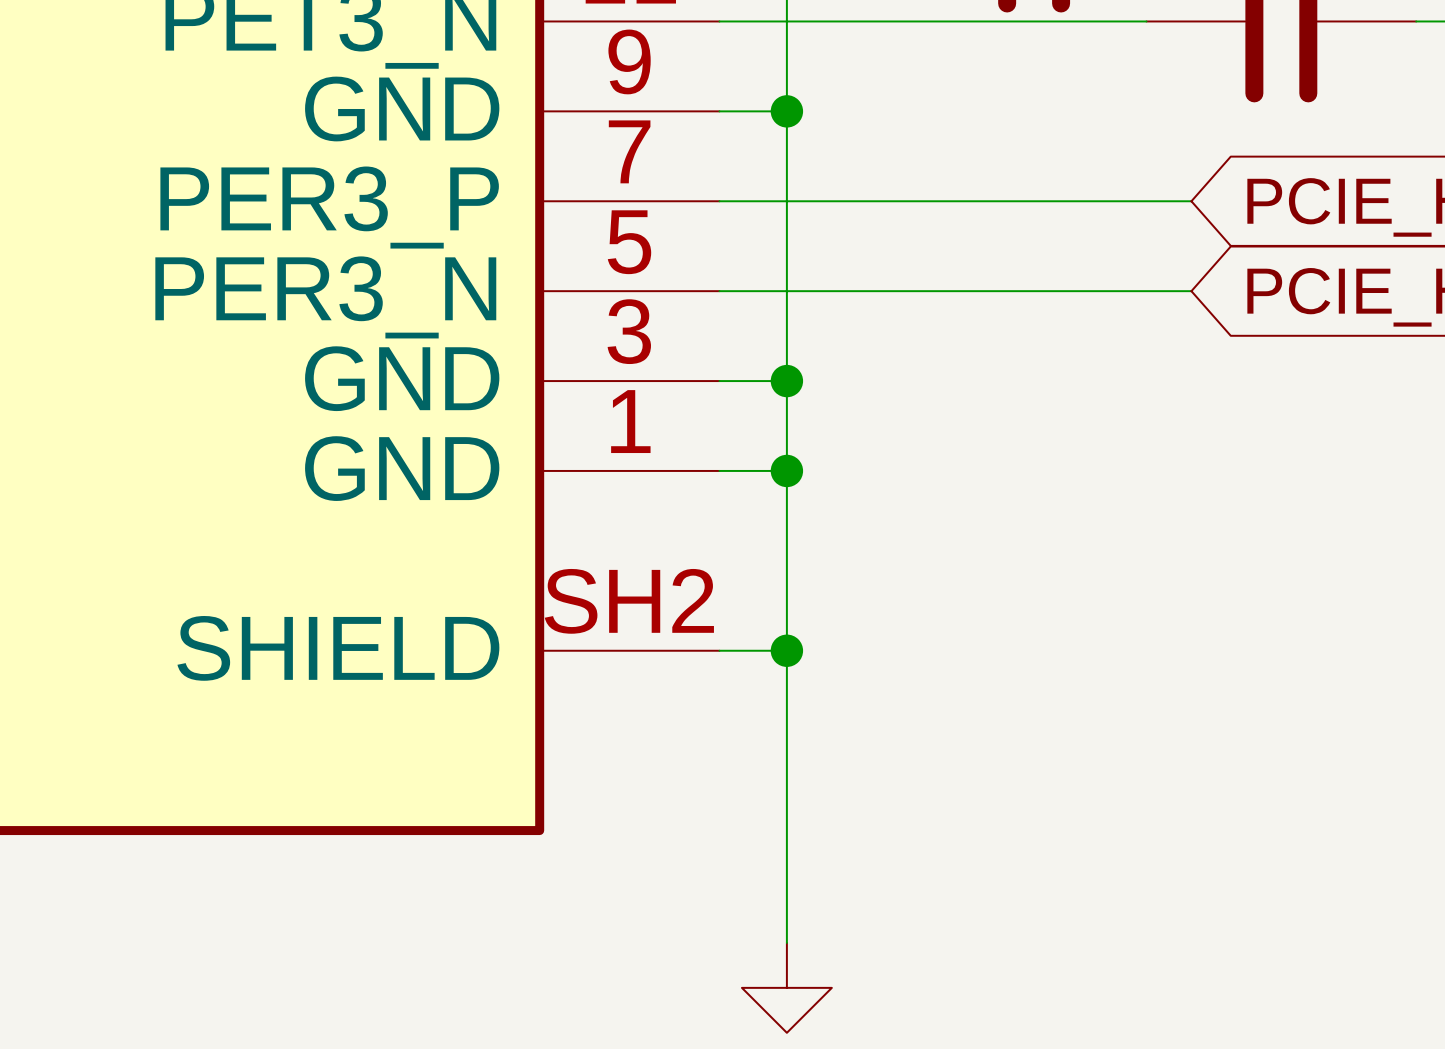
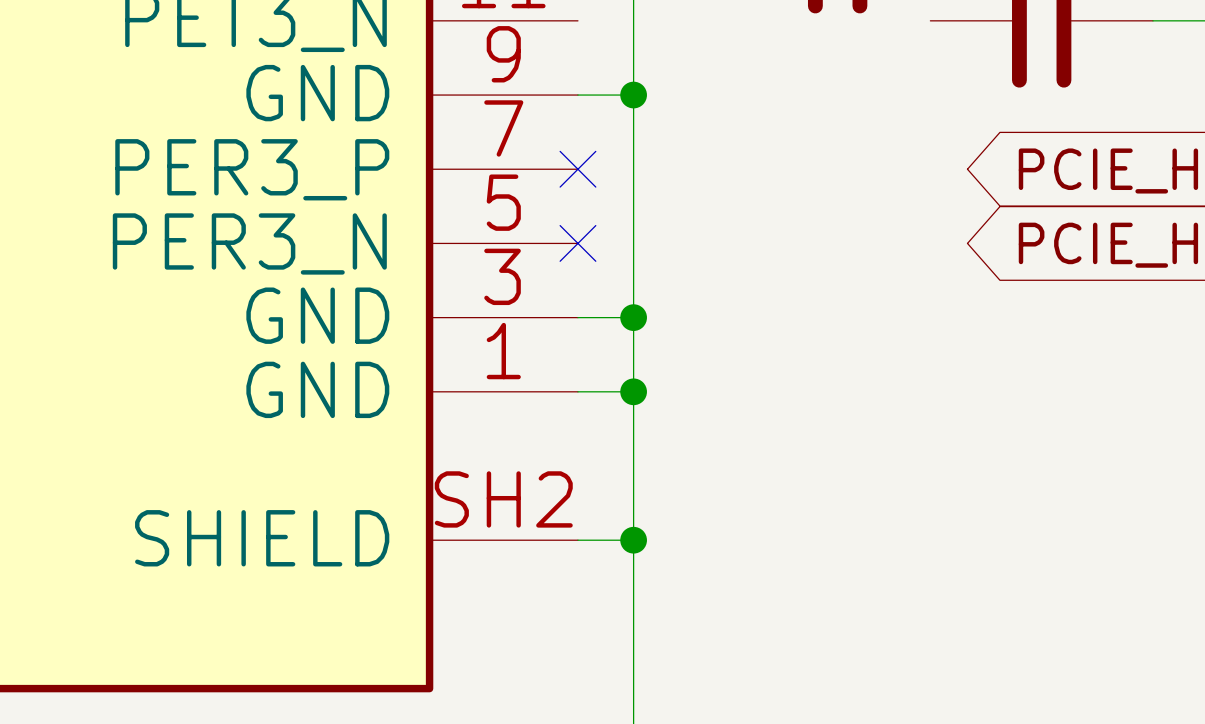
wire: (719, 21) (1146, 21) -> none
wire: (719, 201) (1191, 201) -> none
no-connect mark: none -> (577, 169)
wire: (719, 291) (1191, 291) -> none
no-connect mark: none -> (577, 243)

